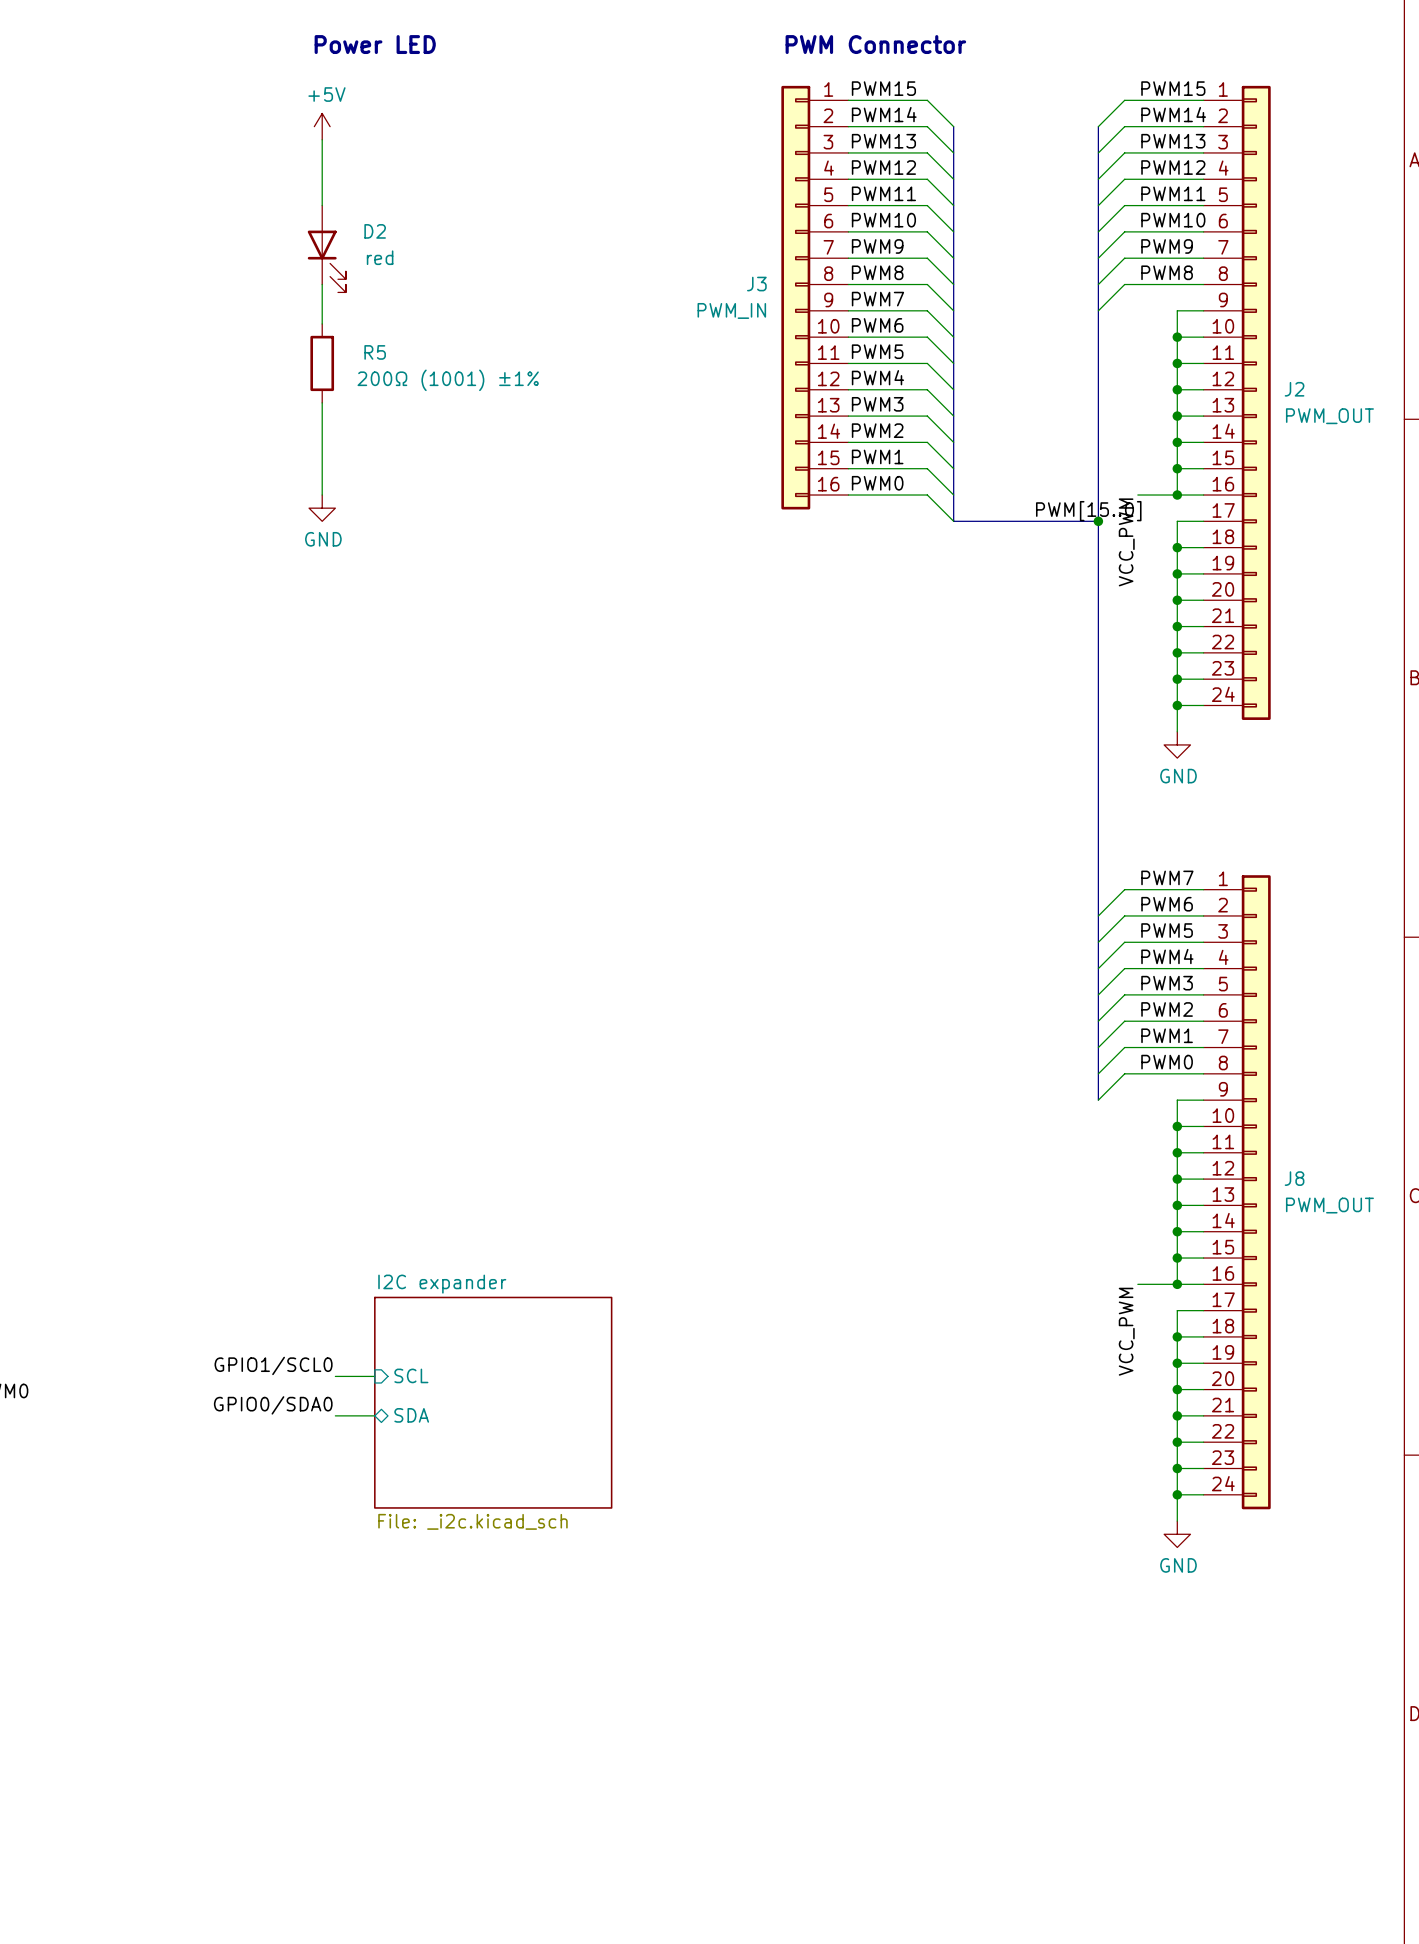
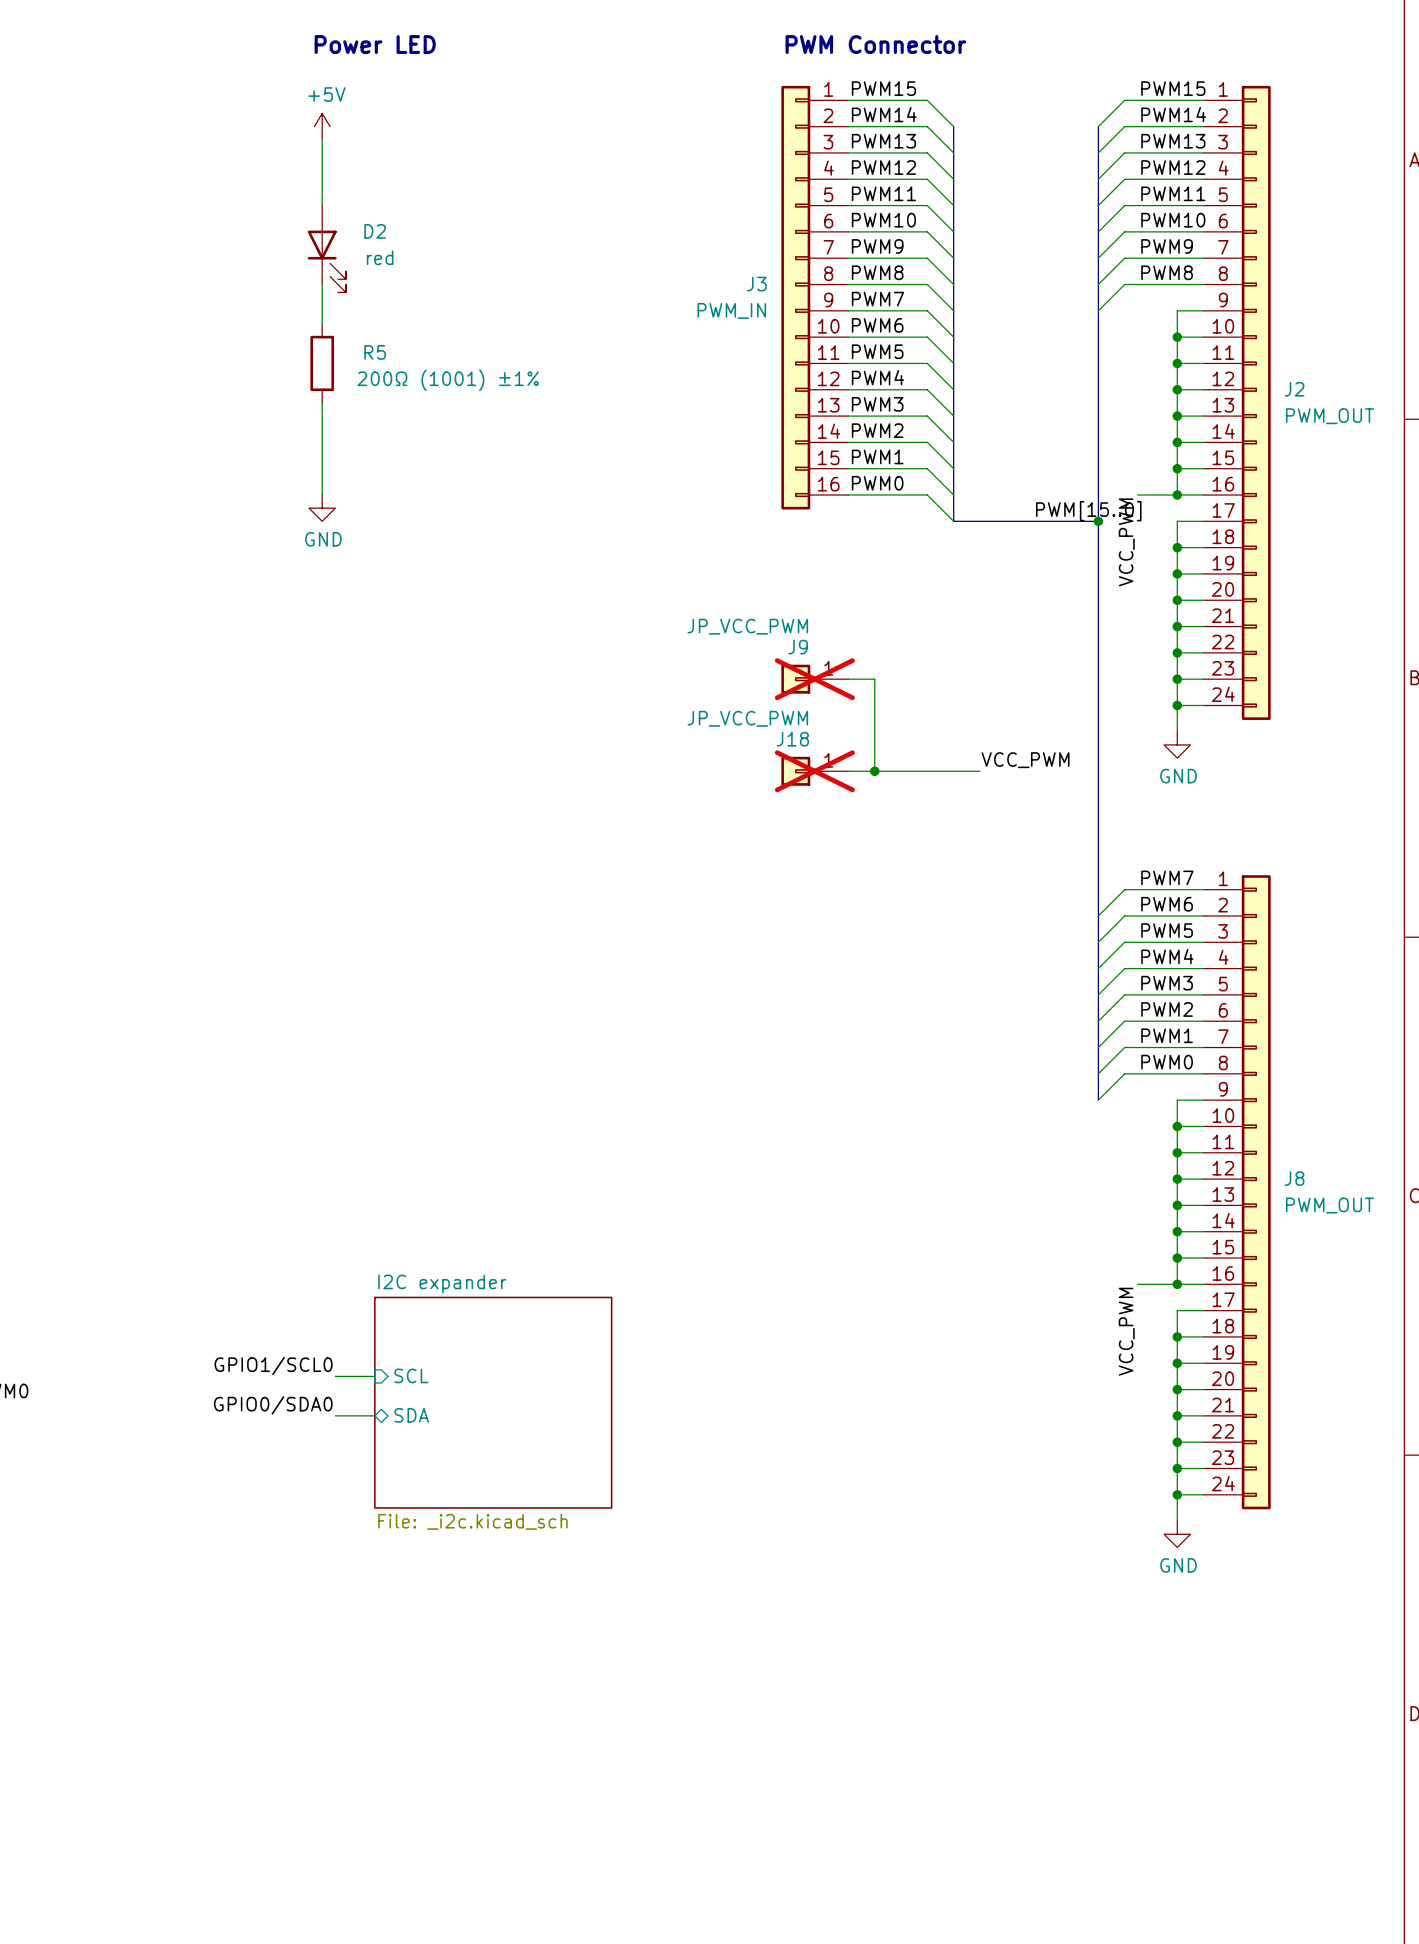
J9: none -> JP_VCC_PWM (814, 679)
wire: none -> (848, 679) (874, 679) (874, 771)
label: none -> VCC_PWM (1025, 760)
J18: none -> JP_VCC_PWM (814, 771)
wire: none -> (848, 771) (979, 771)
junction: none -> (874, 771)

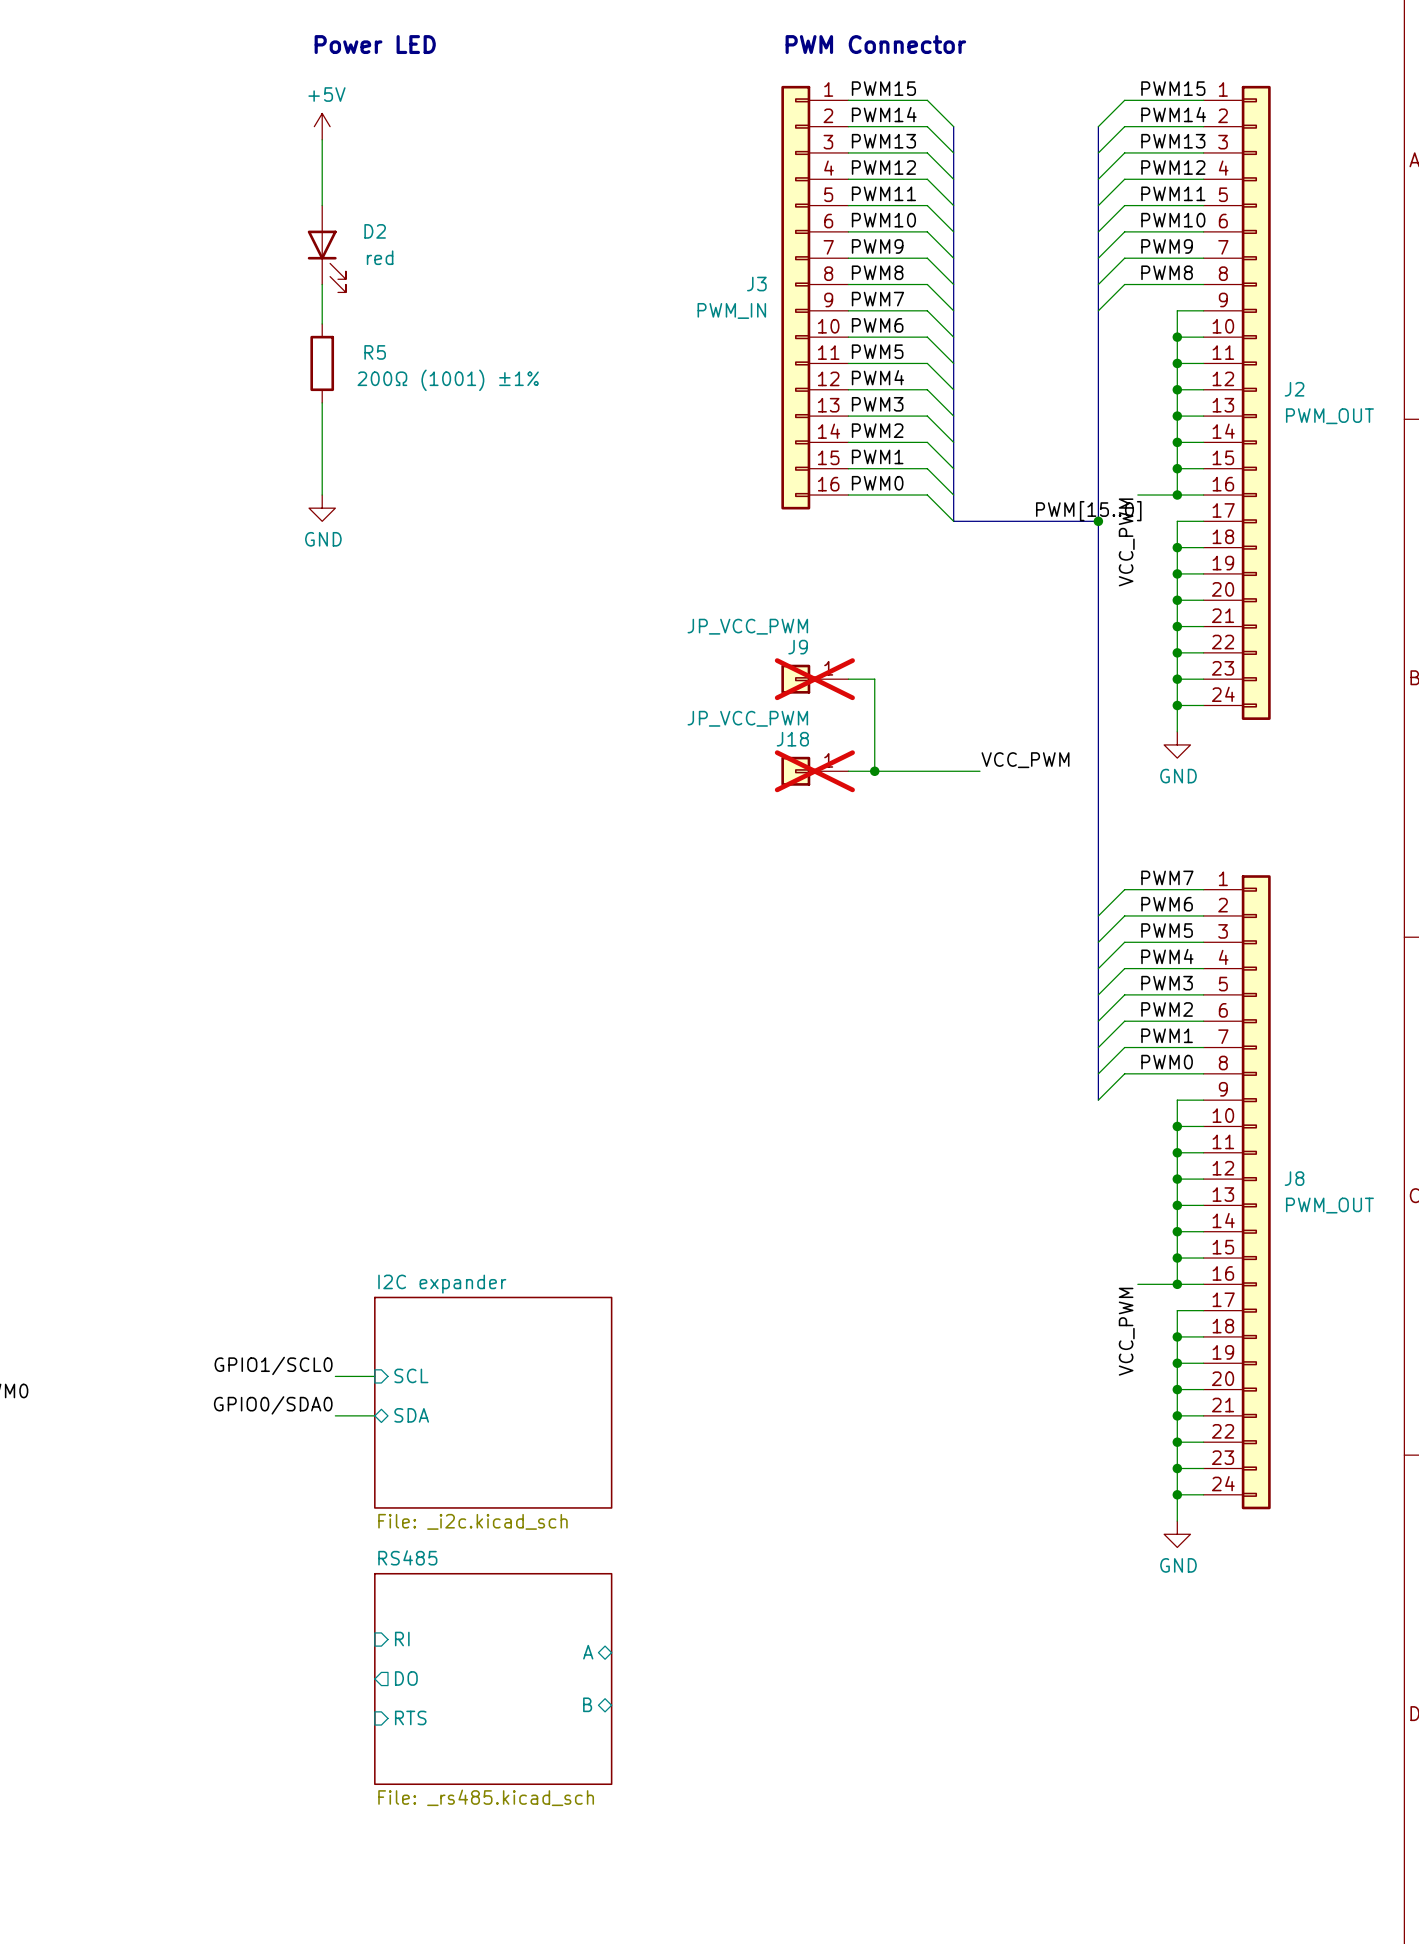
sheet pin: none -> RI (402, 1639)
sheet pin: none -> A (588, 1652)
sheet pin: none -> DO (406, 1678)
sheet RS485: none -> File: _rs485.kicad_sch (493, 1678)
sheet pin: none -> B (587, 1704)
sheet pin: none -> RTS (410, 1717)

